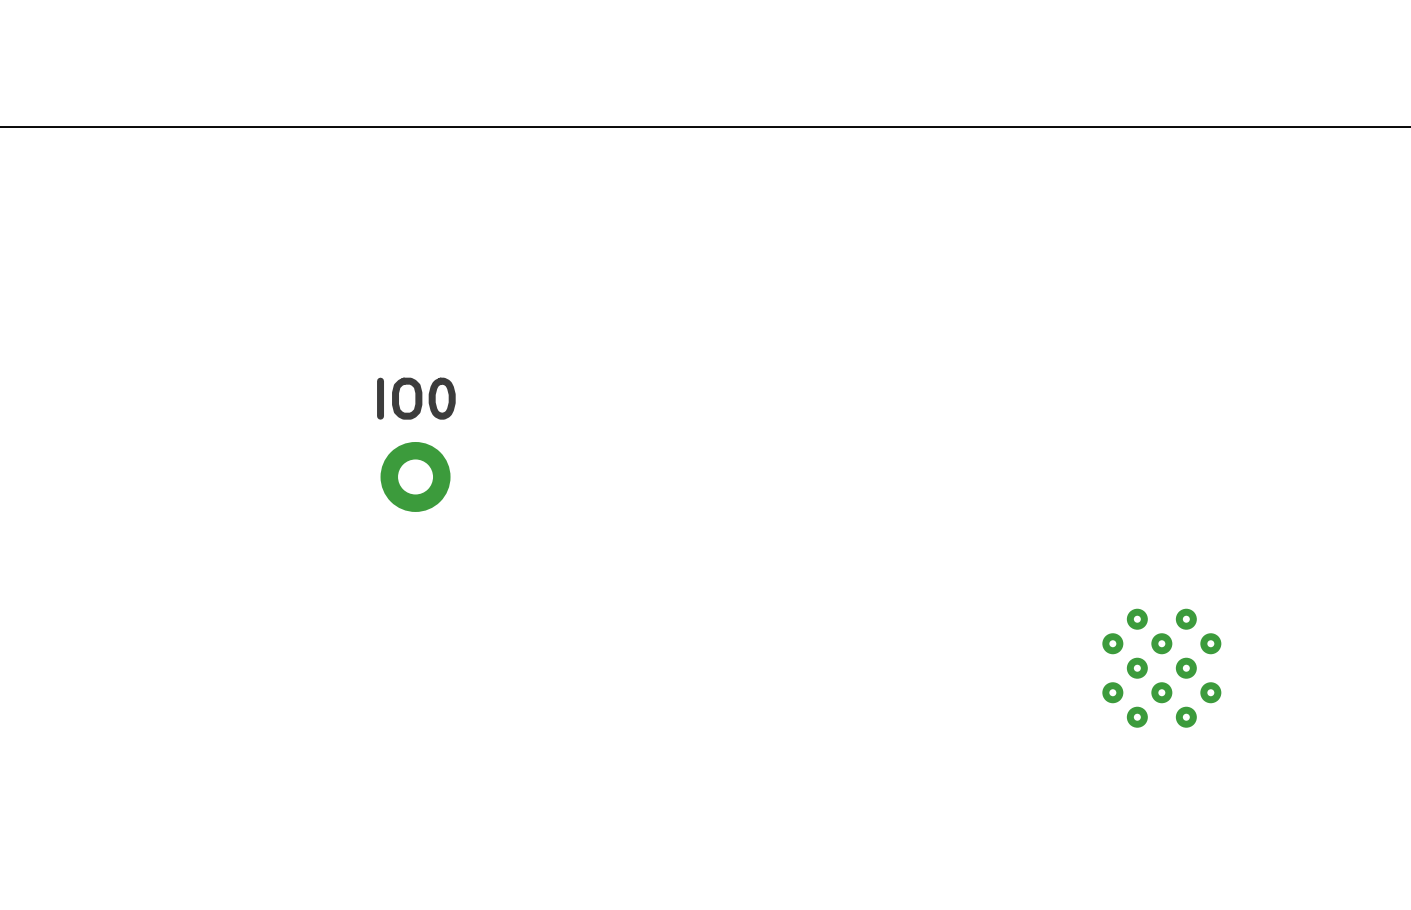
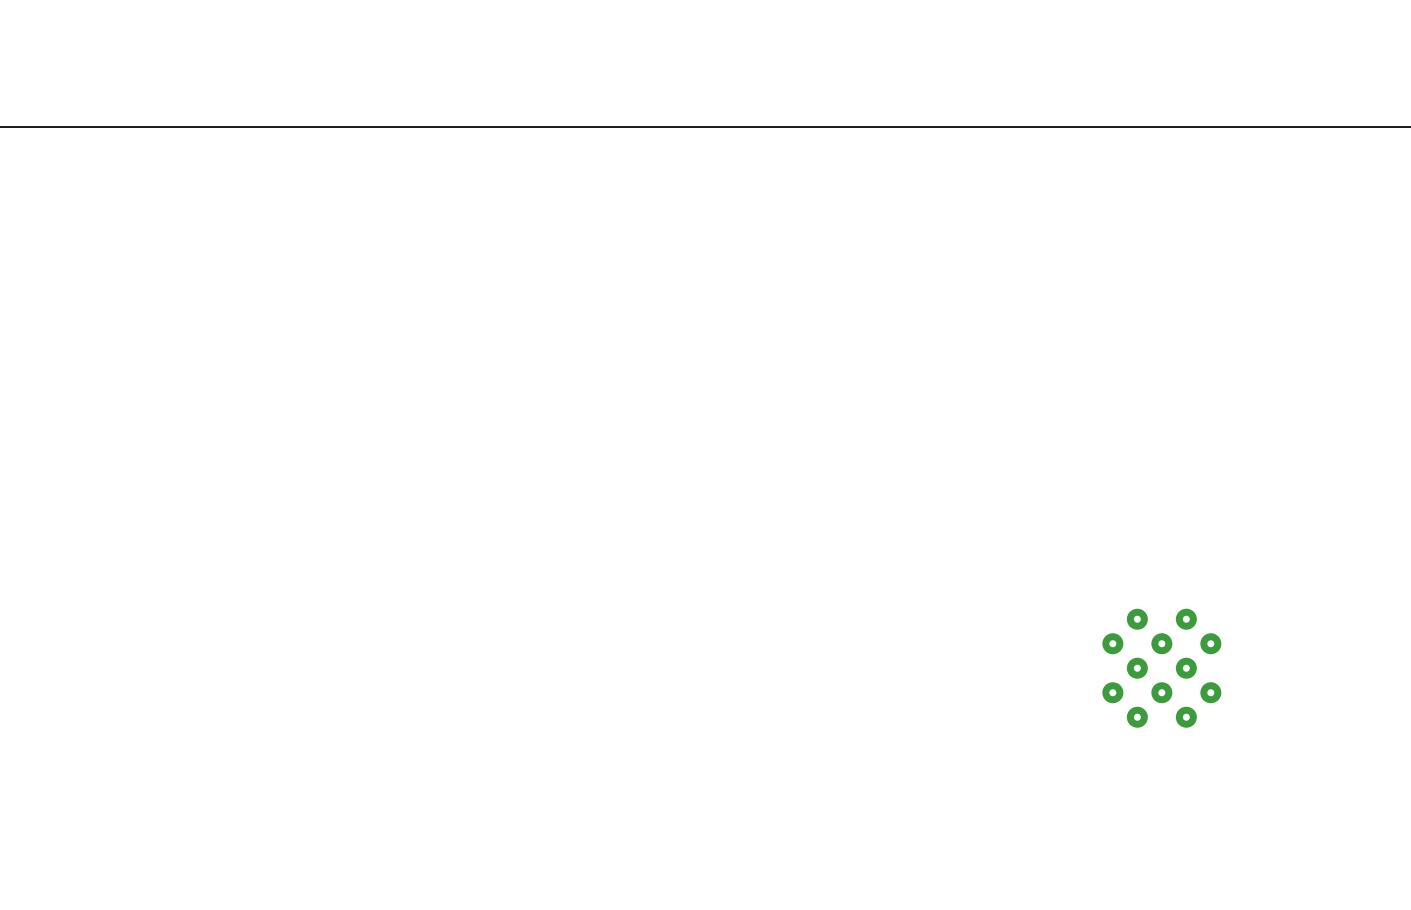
text: IO0 (416, 398) -> none
part: (415, 476) -> none

